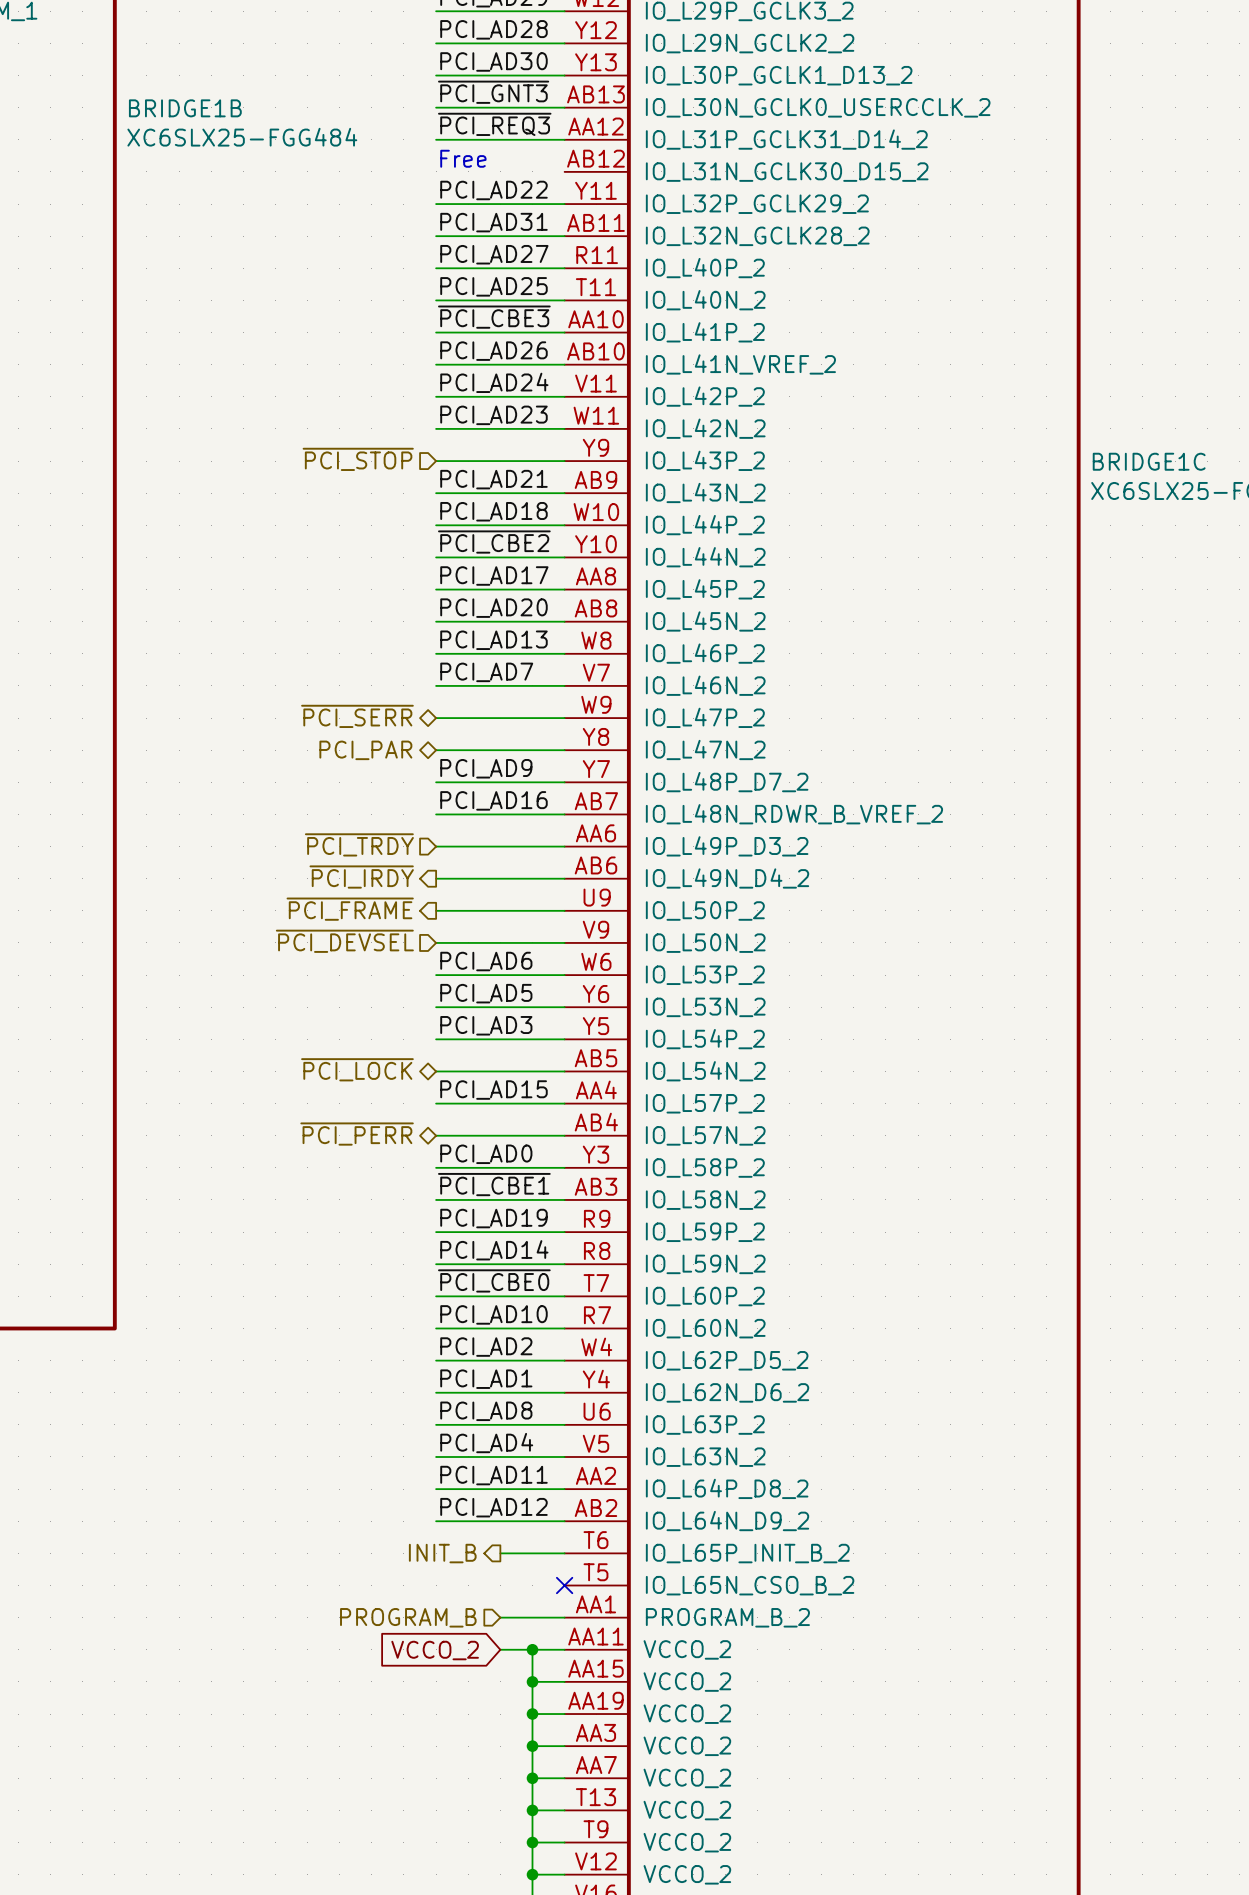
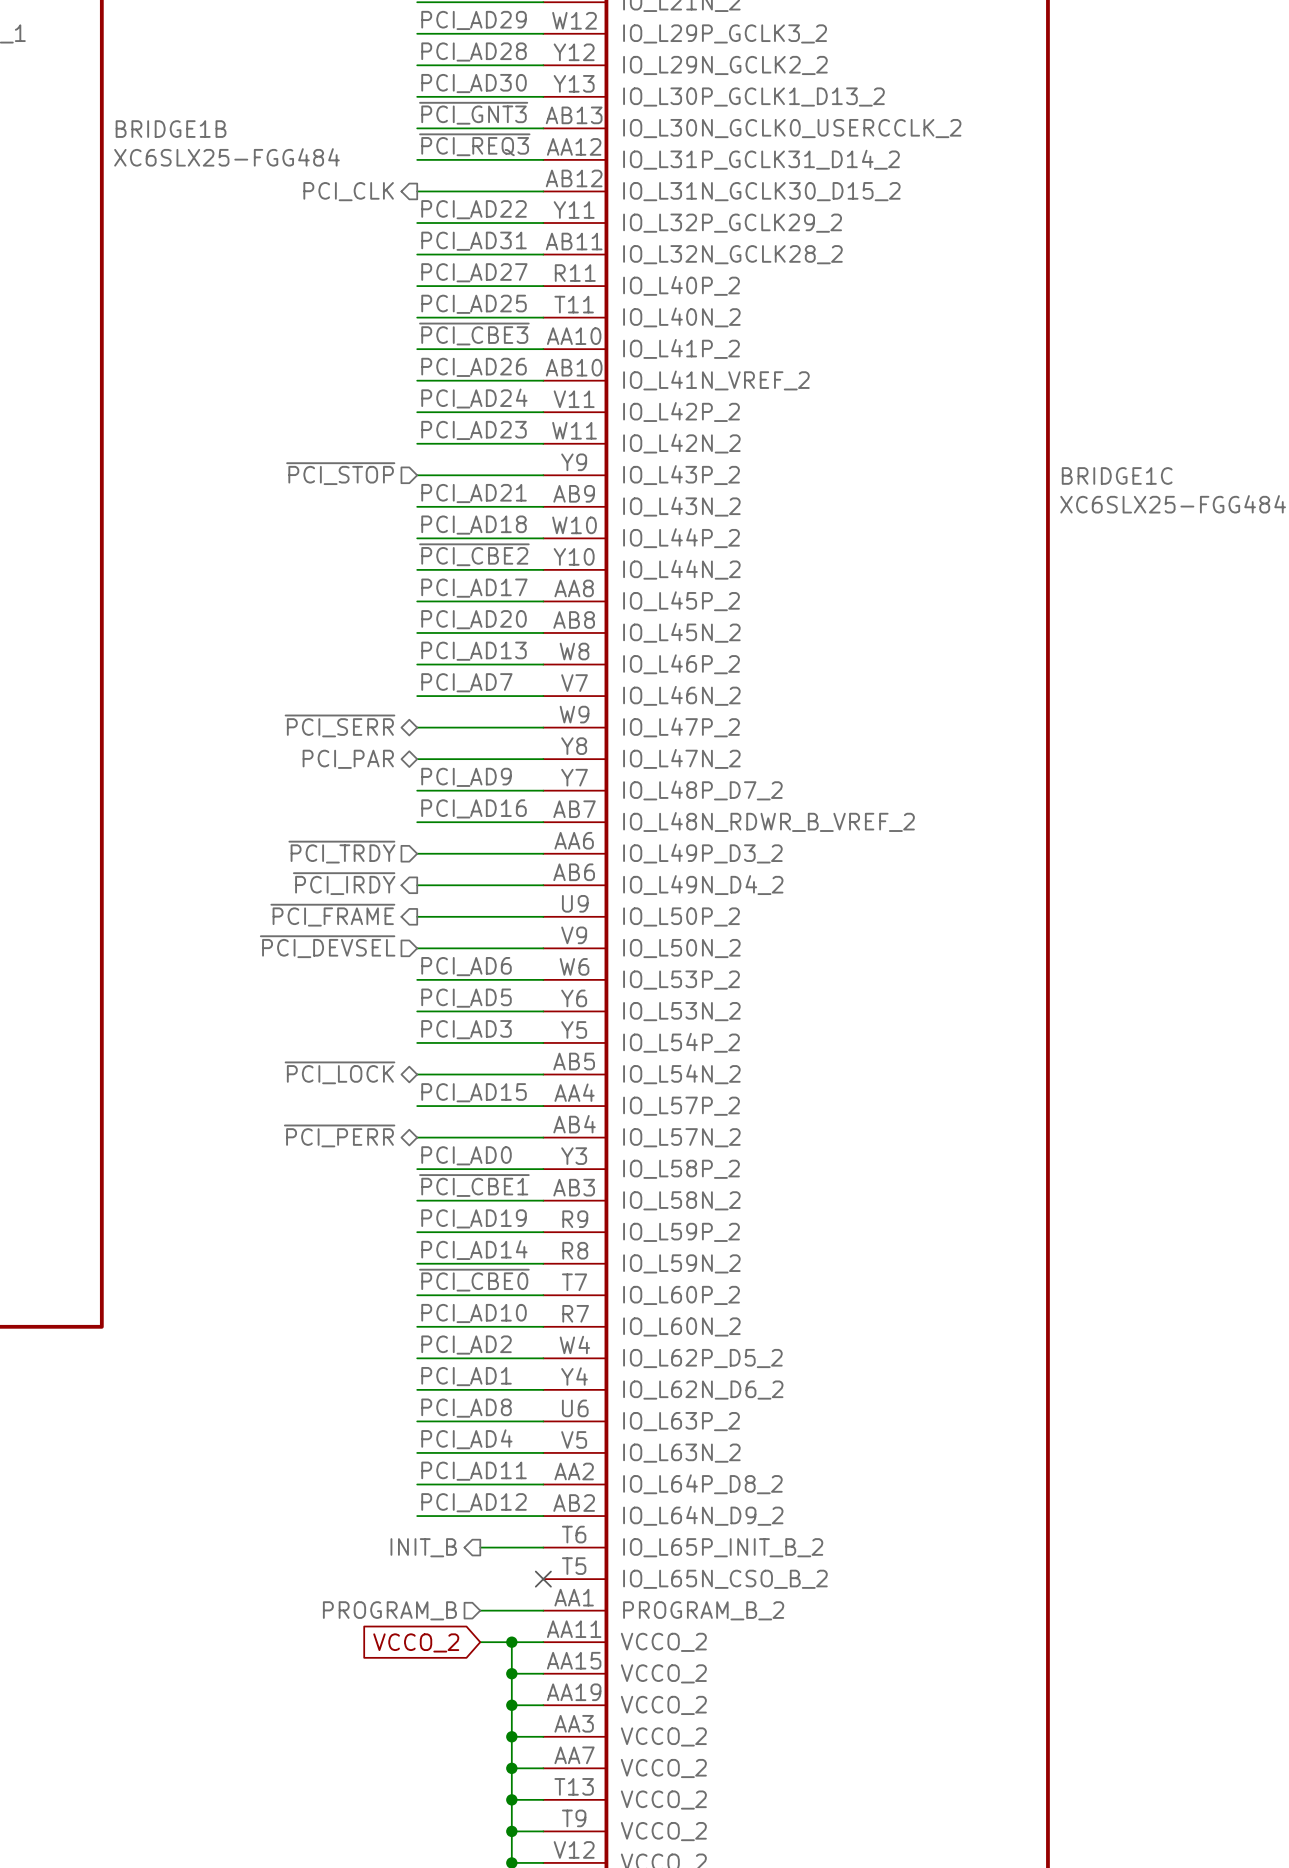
text: Free (463, 158) -> none
wire: none -> (417, 191) (543, 191)
hierarchical label: none -> PCI_CLK (348, 191)

